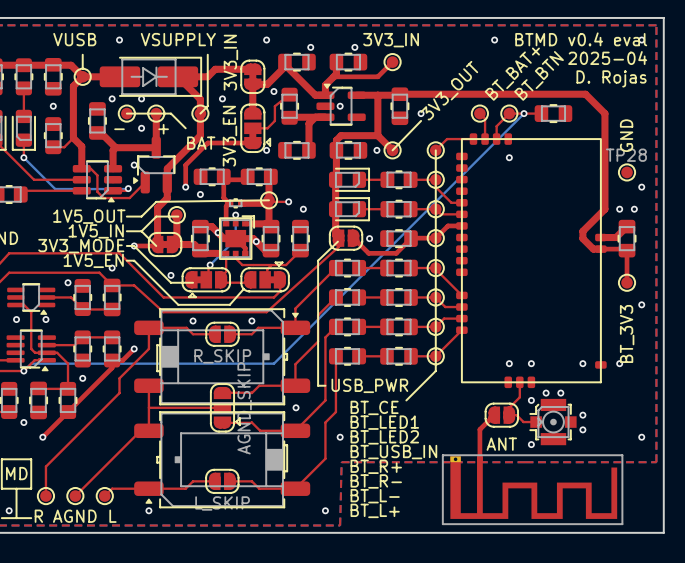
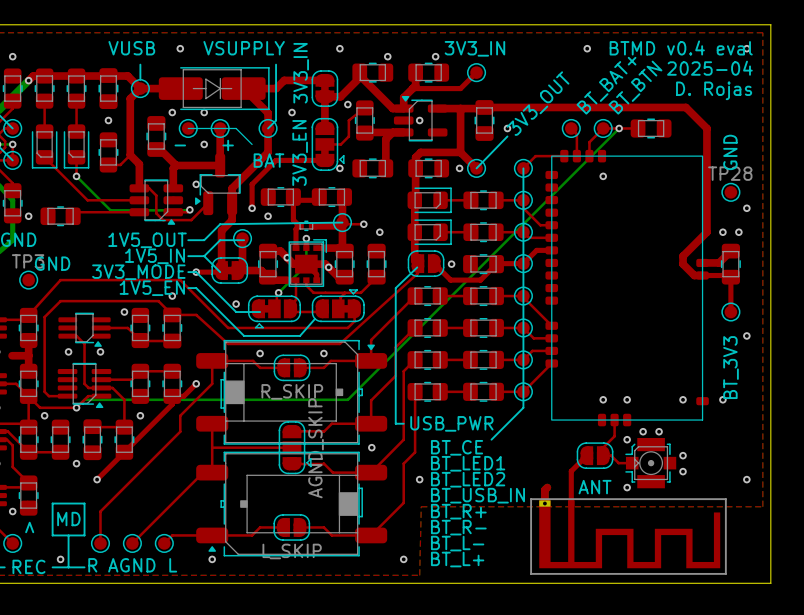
top track: none -> (547, 487) (544, 490) (544, 503)

